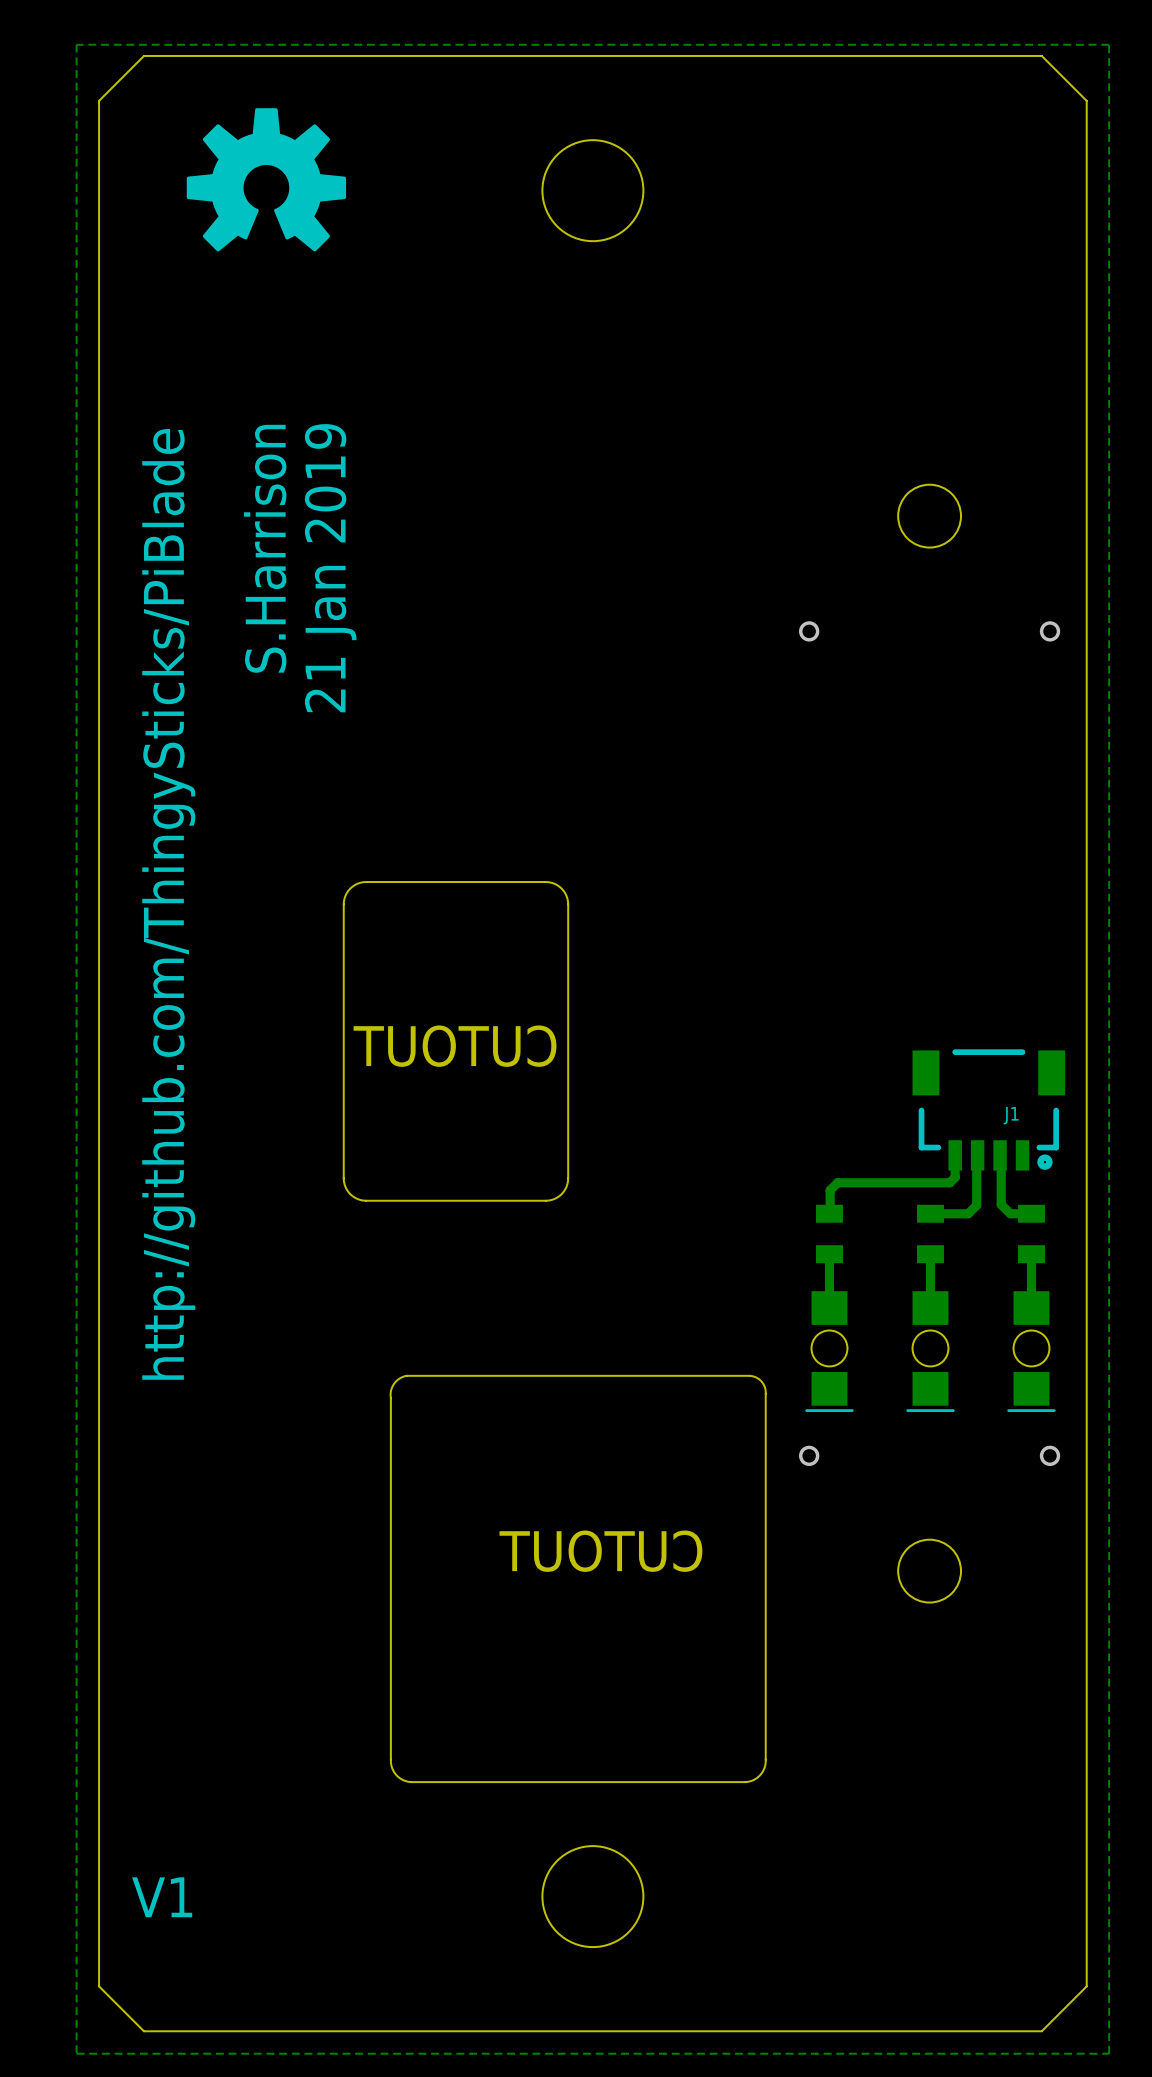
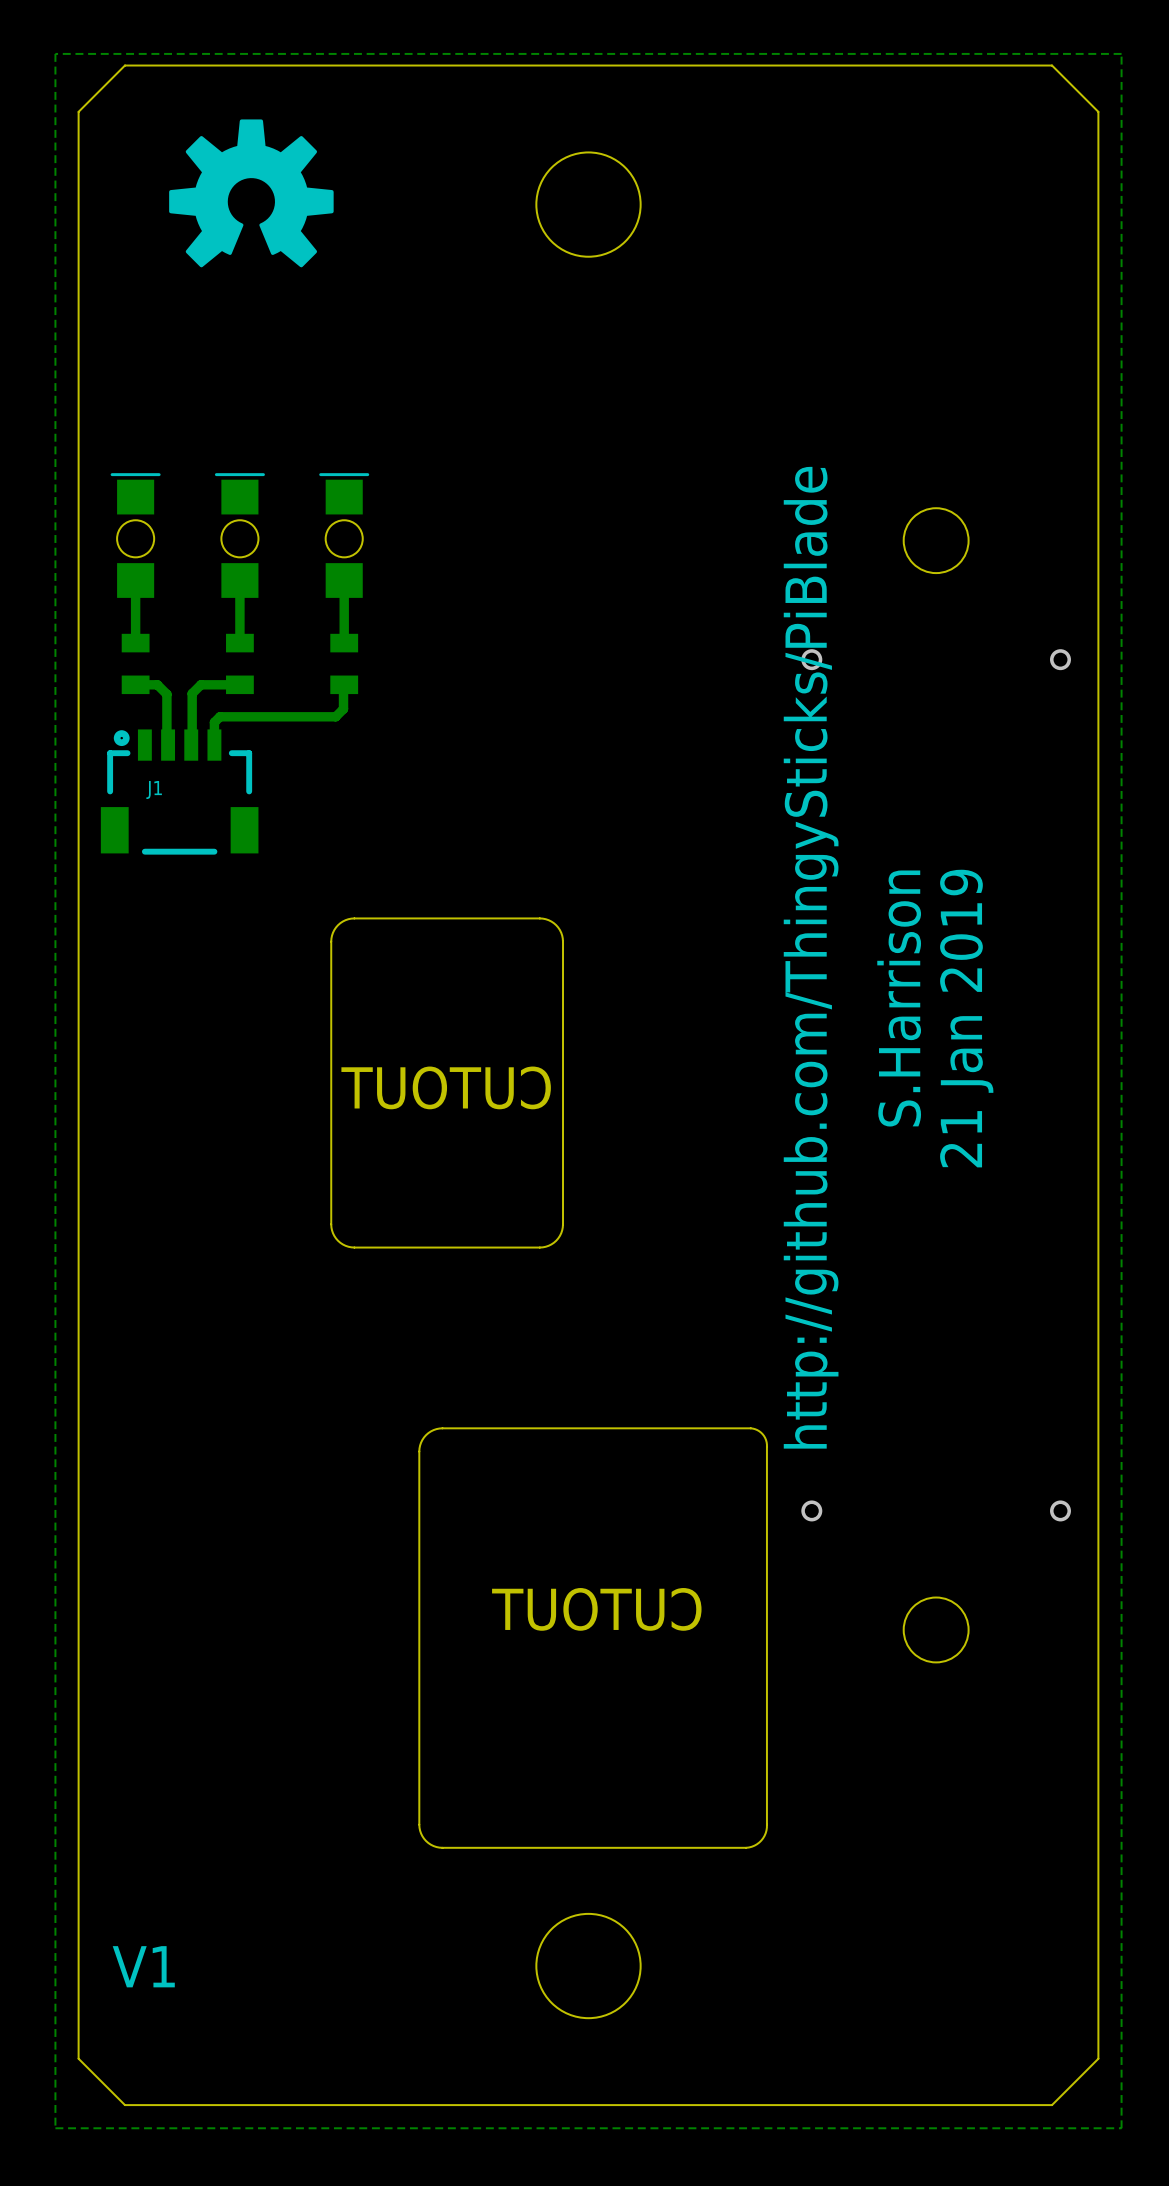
part: none -> (135, 535)
part: none -> (239, 535)
part: none -> (344, 535)
text: S.Harrison (265, 548) -> none
track: none -> (135, 580) (135, 643)
track: none -> (239, 580) (239, 643)
track: none -> (344, 580) (344, 643)
text: 21 Jan 2019 (330, 568) -> none
part: none -> (135, 663)
part: none -> (239, 663)
part: none -> (344, 663)
track: none -> (135, 684) (157, 684) (166, 694) (168, 745)
track: none -> (239, 684) (200, 684) (192, 693) (191, 745)
track: none -> (344, 684) (343, 709) (335, 716) (219, 716) (214, 722) (214, 745)
text: http://github.com/ThingySticks/PiBlade (168, 904) -> none
text: none -> http://github.com/ThingySticks/PiBlade (811, 957)
text: none -> S.Harrison (899, 998)
text: none -> 21 Jan 2019 (966, 1018)
J1 rotation: 0° (988, 1109) -> 180° (179, 792)
J1 position: (988, 1109) -> (179, 792)
track: (955, 1155) (955, 1177) (949, 1182) (837, 1182) (830, 1190) (829, 1213) -> none
track: (977, 1155) (976, 1205) (968, 1213) (930, 1213) -> none
track: (1000, 1155) (1001, 1204) (1010, 1213) (1031, 1213) -> none
part: (829, 1233) -> none
part: (930, 1233) -> none
part: (1031, 1233) -> none
track: (829, 1254) (829, 1308) -> none
track: (930, 1254) (930, 1308) -> none
track: (1031, 1254) (1031, 1308) -> none
part: (829, 1351) -> none
part: (930, 1351) -> none
part: (1031, 1351) -> none
board edge: (451, 1375) (404, 1376) (394, 1383) (390, 1395) (391, 1765) (396, 1775) (405, 1781) (451, 1782) -> (442, 1428) (433, 1430) (426, 1435) (421, 1442) (419, 1451) (419, 1824) (421, 1833) (426, 1841) (433, 1846) (442, 1847)

